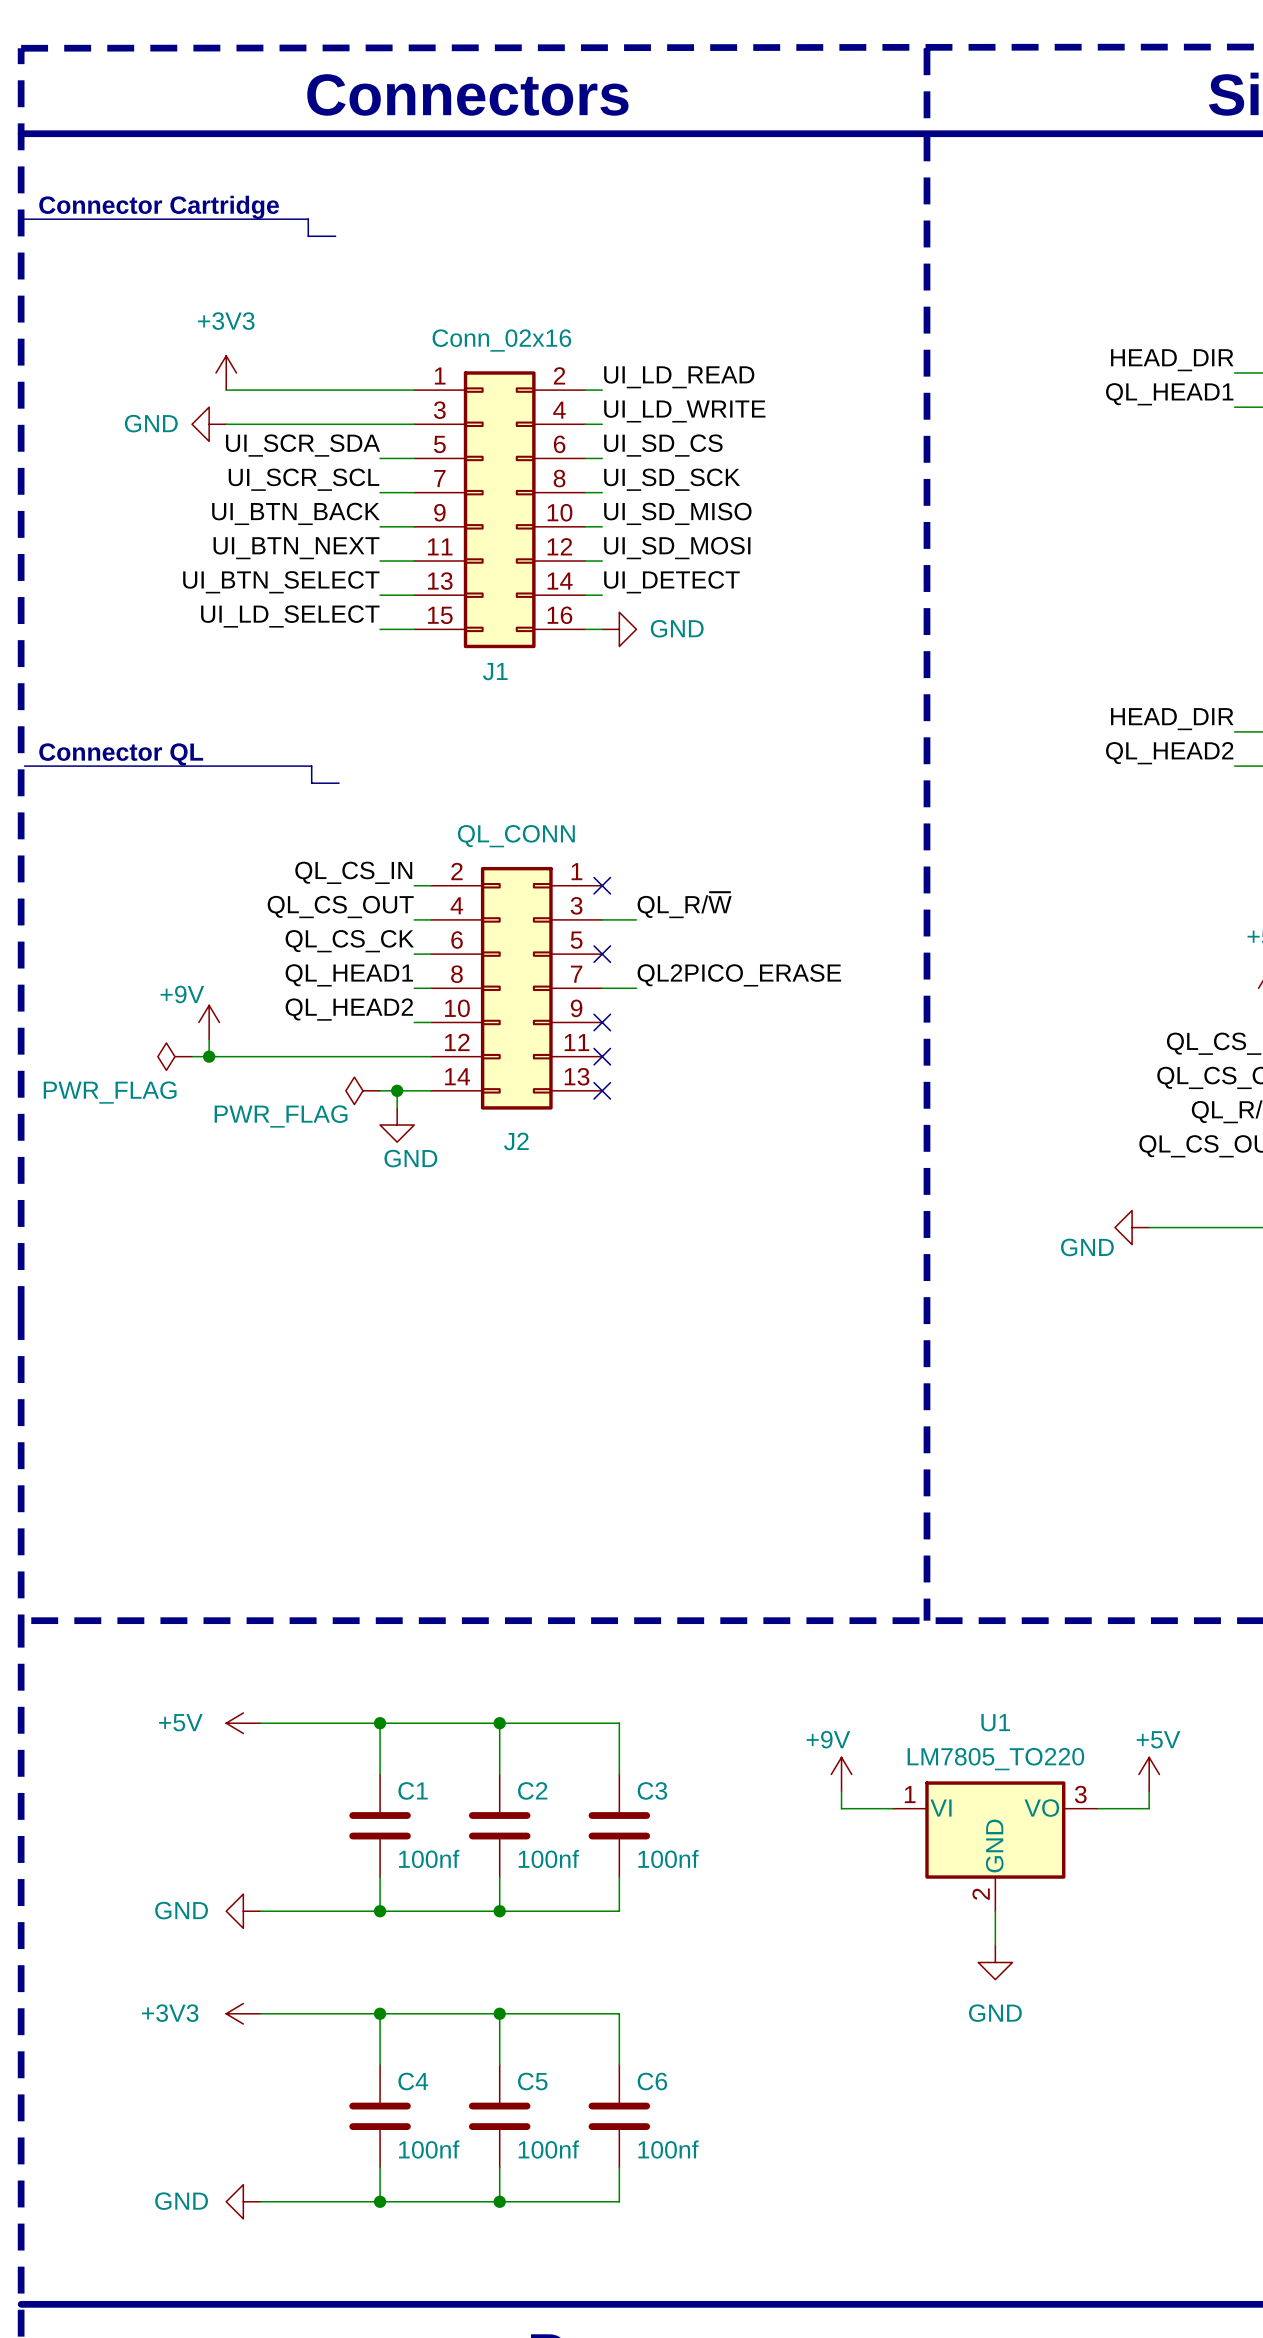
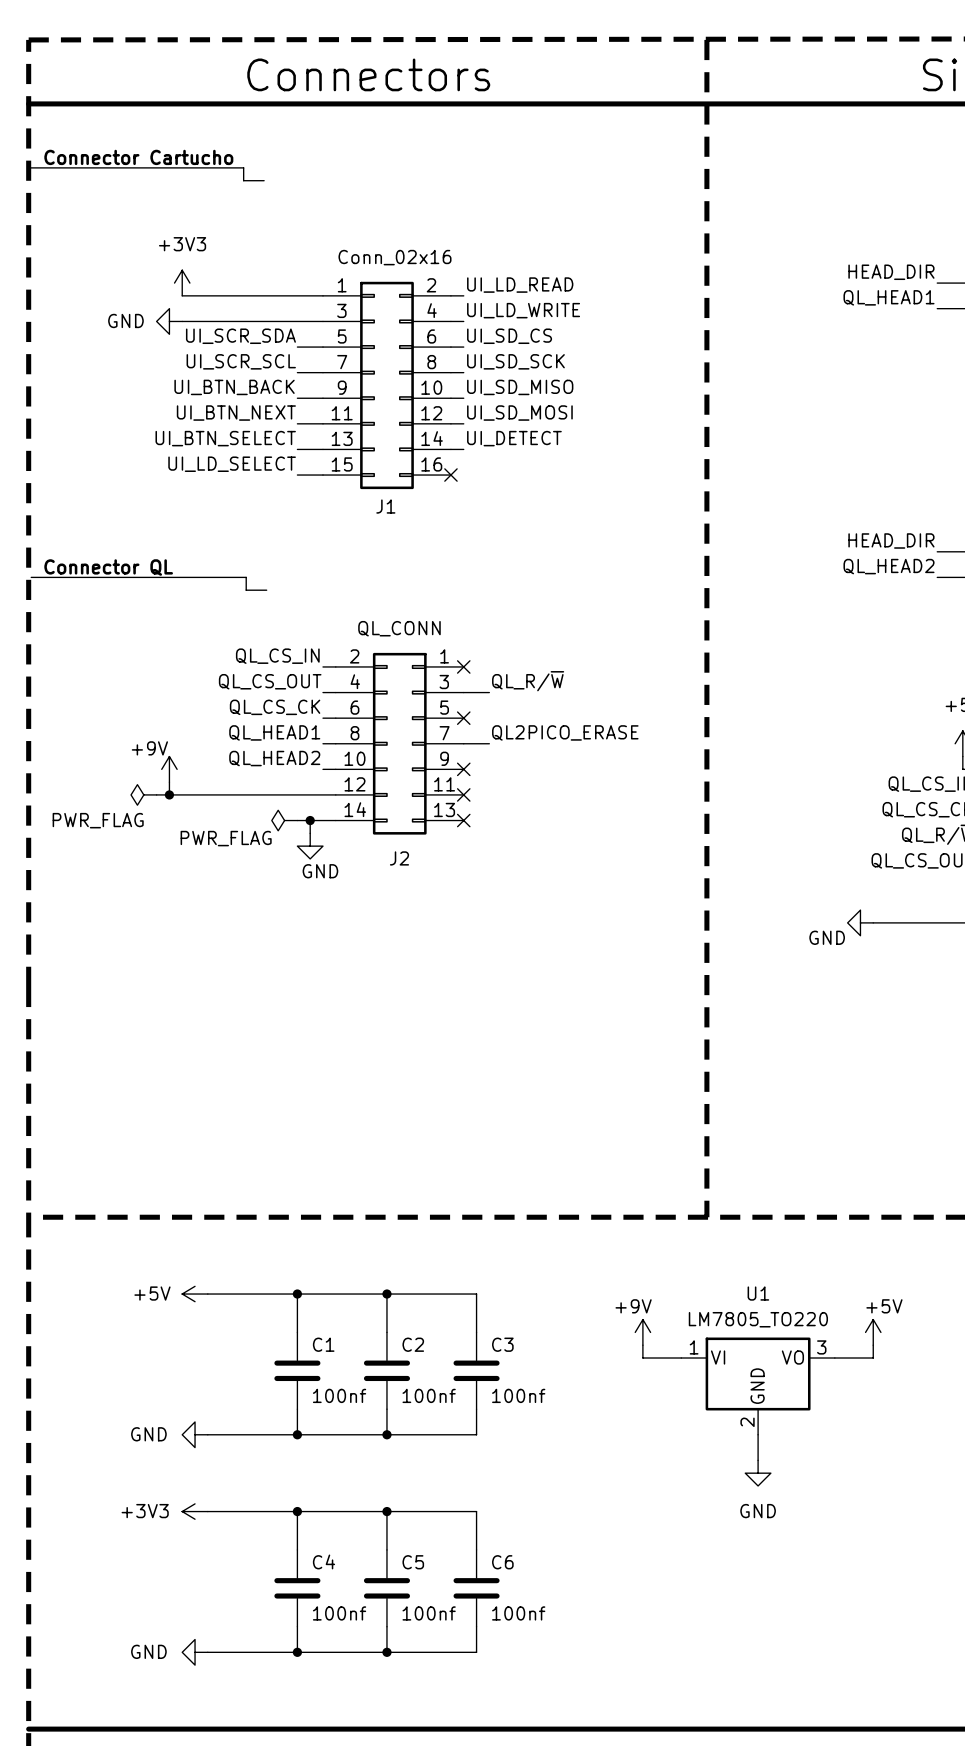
text: Connector Cartridge (159, 207) -> Connector Cartucho (138, 157)
wire: (585, 629) (602, 629) -> none
no-connect mark: none -> (450, 475)
power symbol: GND (619, 629) -> none

